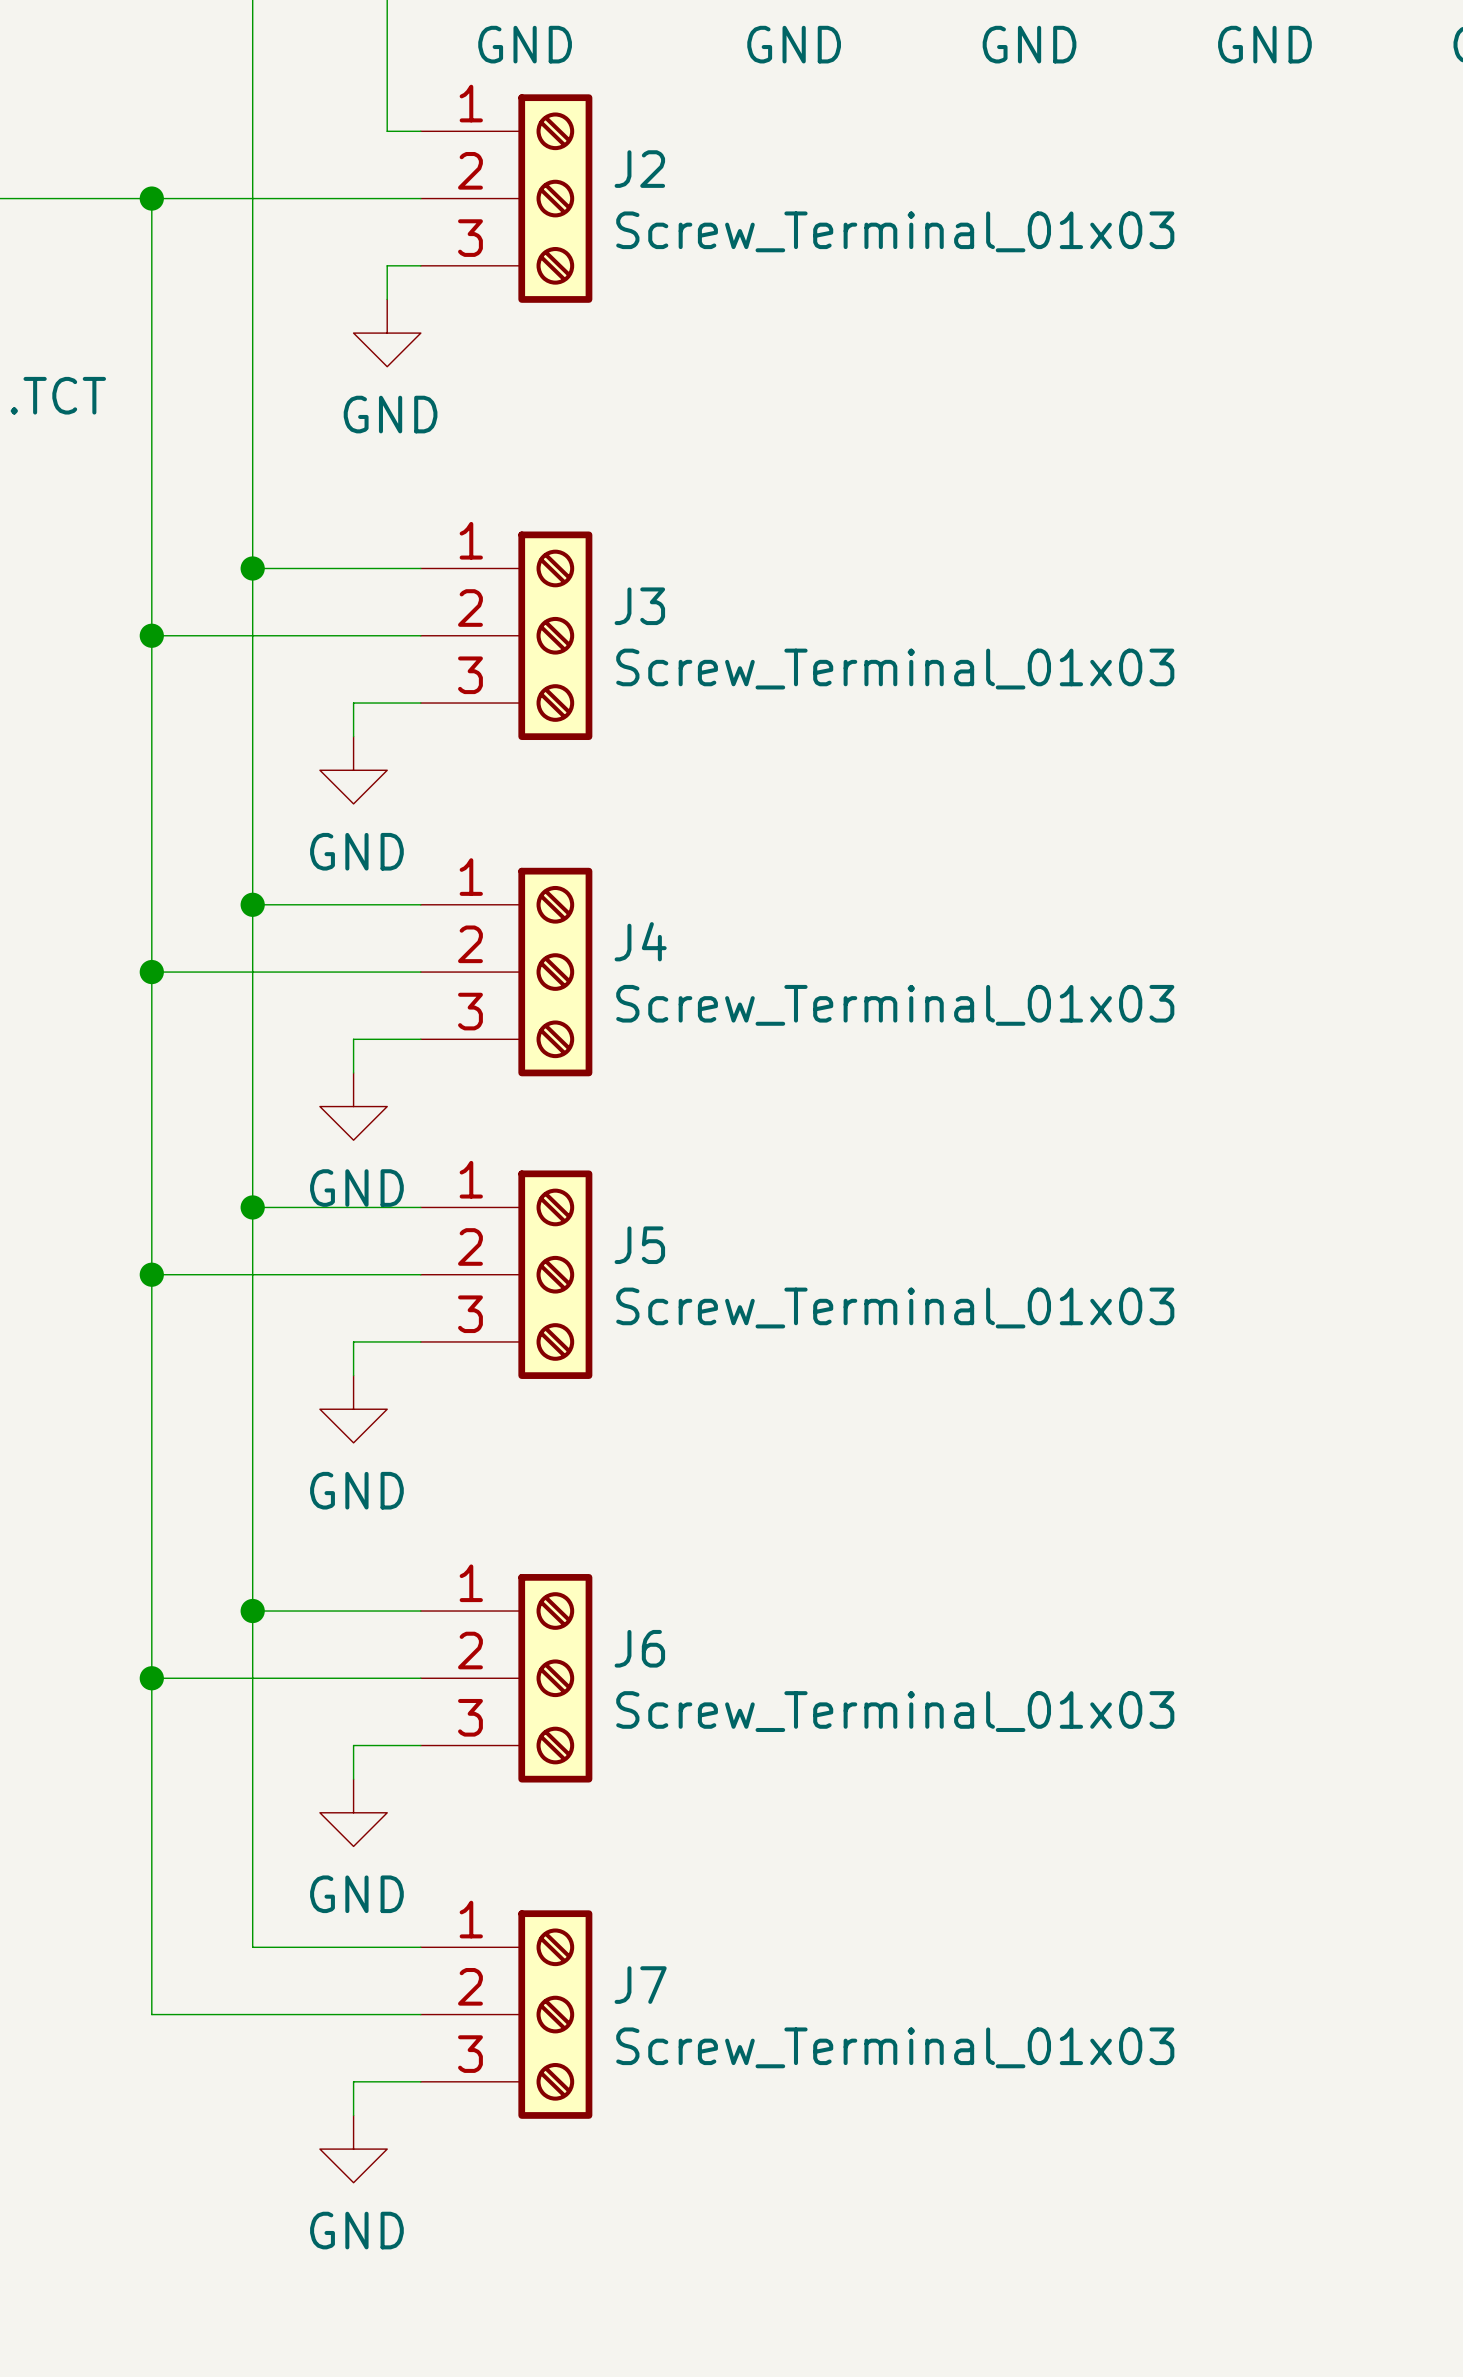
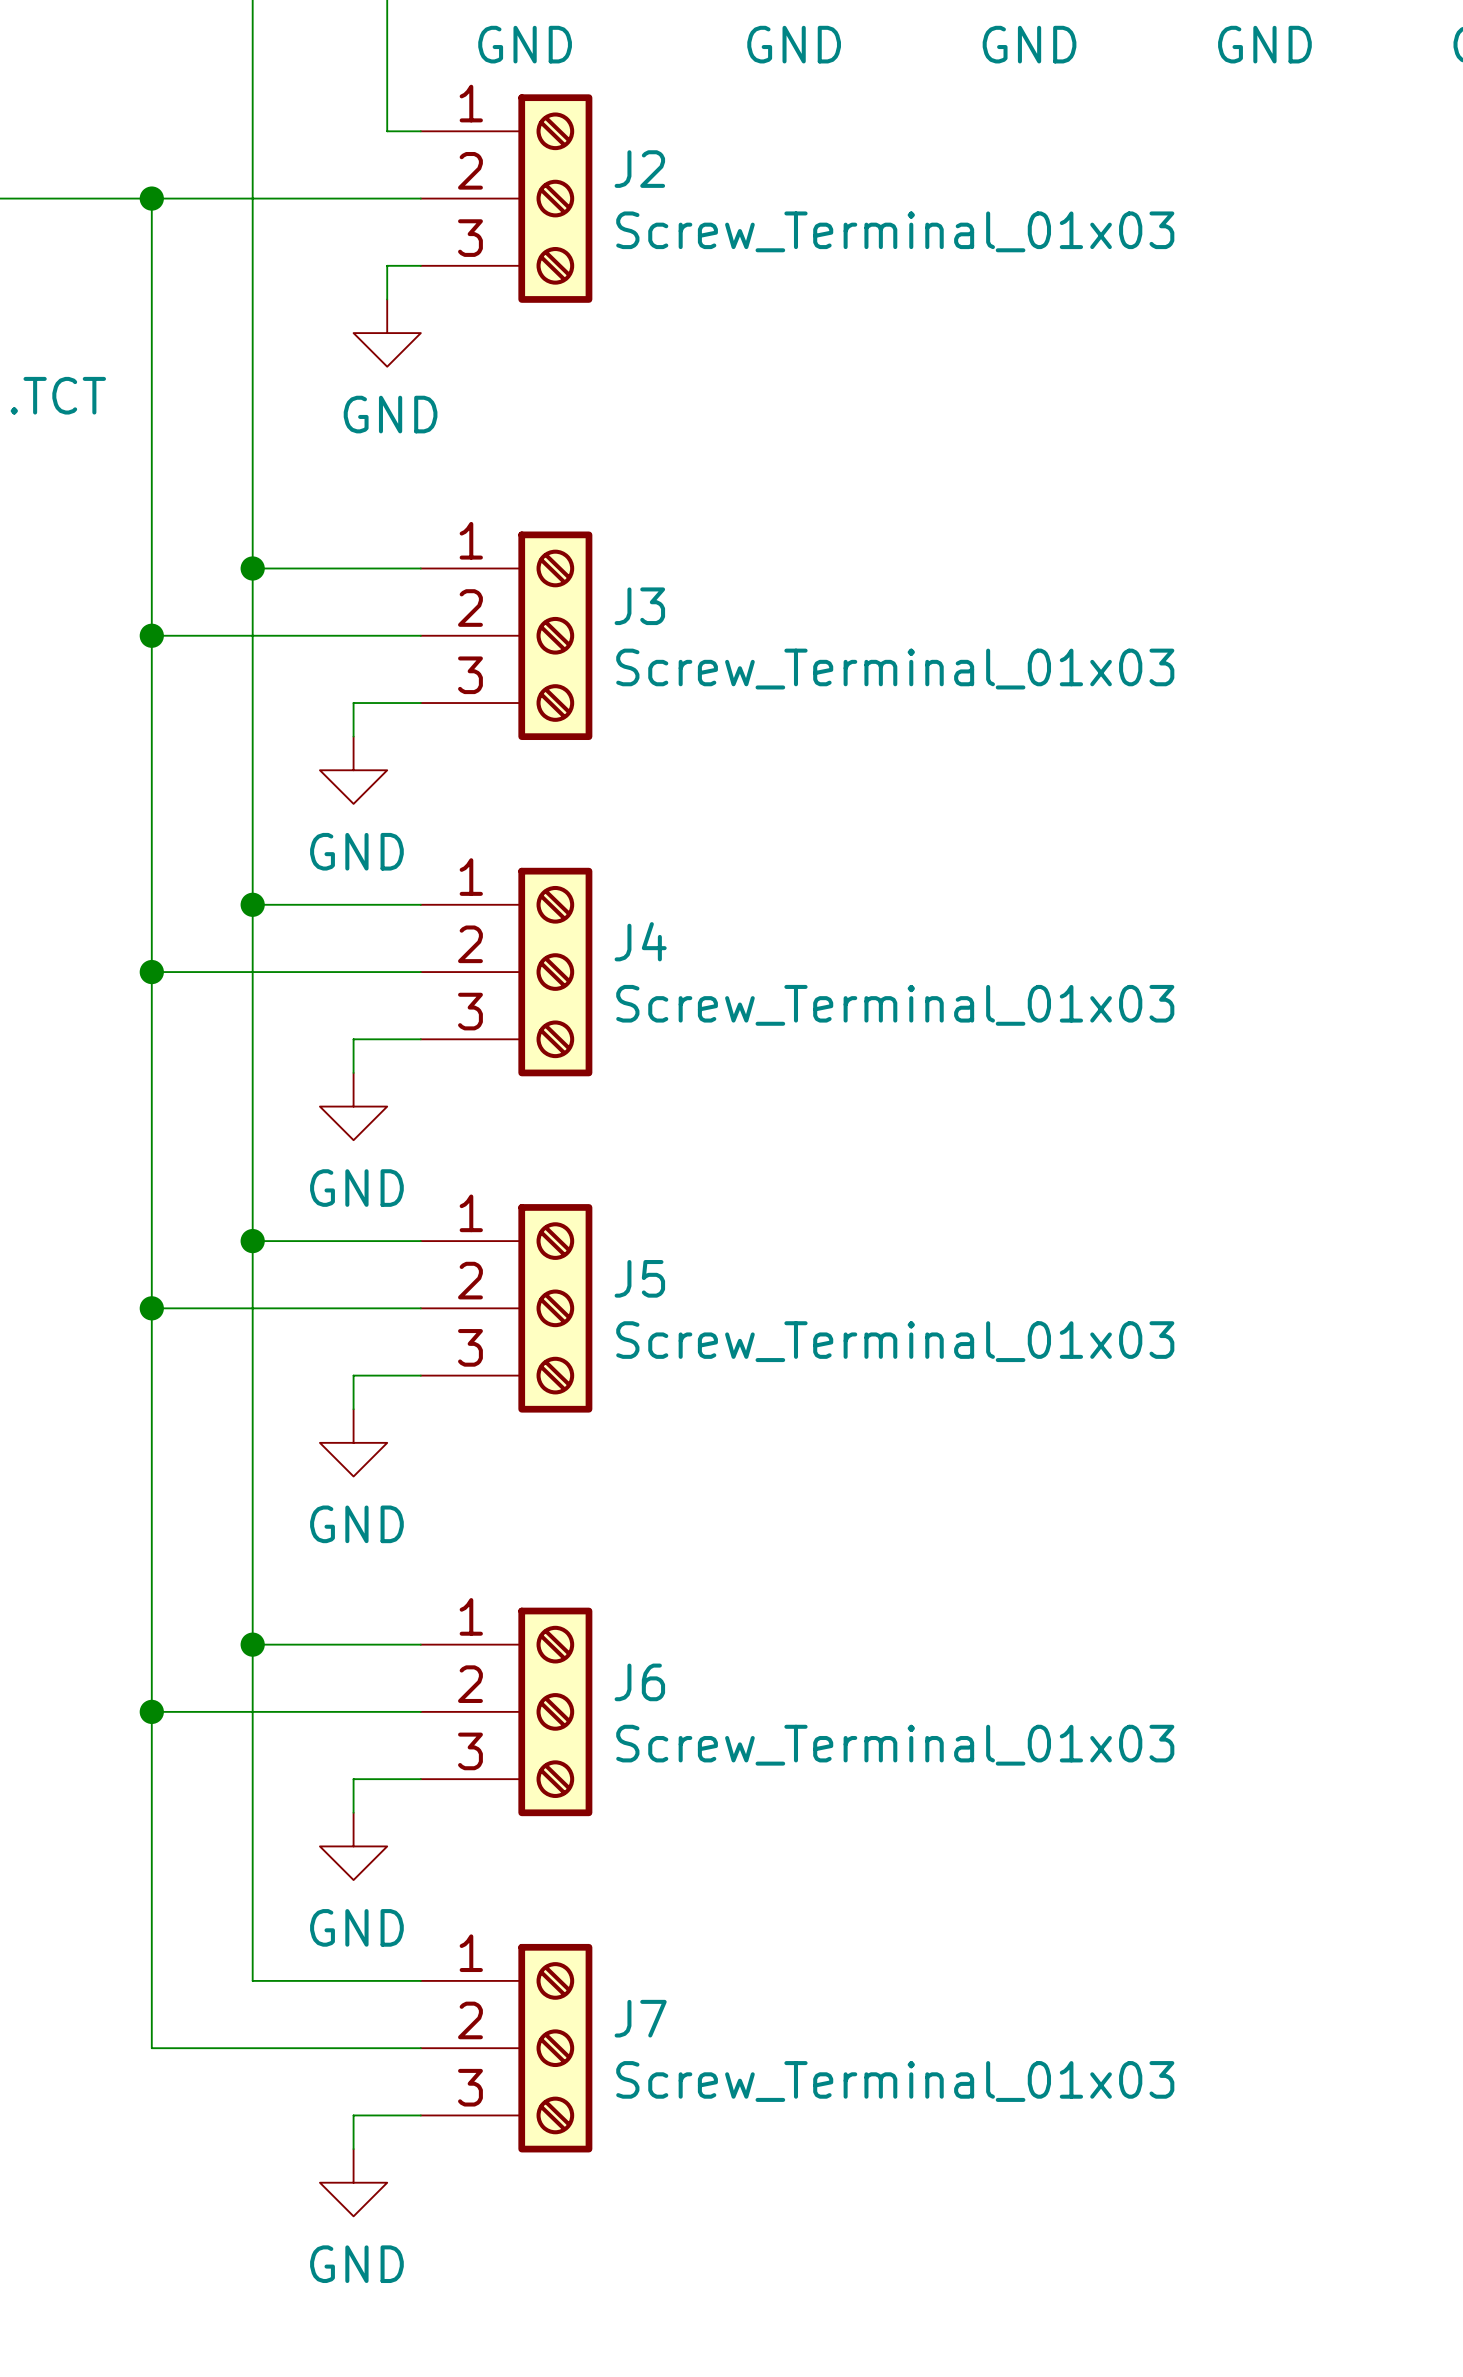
wire: (252, 1207) (420, 1207) -> (252, 1241) (420, 1241)
junction position: (252, 1207) -> (252, 1241)
wire: (151, 1274) (420, 1274) -> (151, 1308) (420, 1308)
junction position: (151, 1274) -> (151, 1308)
J5 position: (506, 1274) -> (506, 1308)
wire: (420, 1341) (353, 1341) (353, 1375) -> (420, 1375) (353, 1375) (353, 1409)
power symbol position: GND (353, 1409) -> GND (353, 1442)
wire: (252, 1611) (420, 1611) -> (252, 1644) (420, 1644)
junction position: (252, 1611) -> (252, 1644)
wire: (151, 1678) (420, 1678) -> (151, 1711) (420, 1711)
junction position: (151, 1678) -> (151, 1711)
J6 position: (506, 1678) -> (506, 1711)
wire: (420, 1745) (353, 1745) (353, 1779) -> (420, 1779) (353, 1779) (353, 1812)
power symbol position: GND (353, 1812) -> GND (353, 1846)
wire: (252, 1947) (420, 1947) -> (252, 1947) (252, 1980) (420, 1980)
wire: (151, 2014) (420, 2014) -> (151, 2014) (151, 2048) (420, 2048)
J7 position: (506, 2014) -> (506, 2048)
wire: (420, 2081) (353, 2081) (353, 2115) -> (420, 2115) (353, 2115) (353, 2149)
power symbol position: GND (353, 2149) -> GND (353, 2182)

